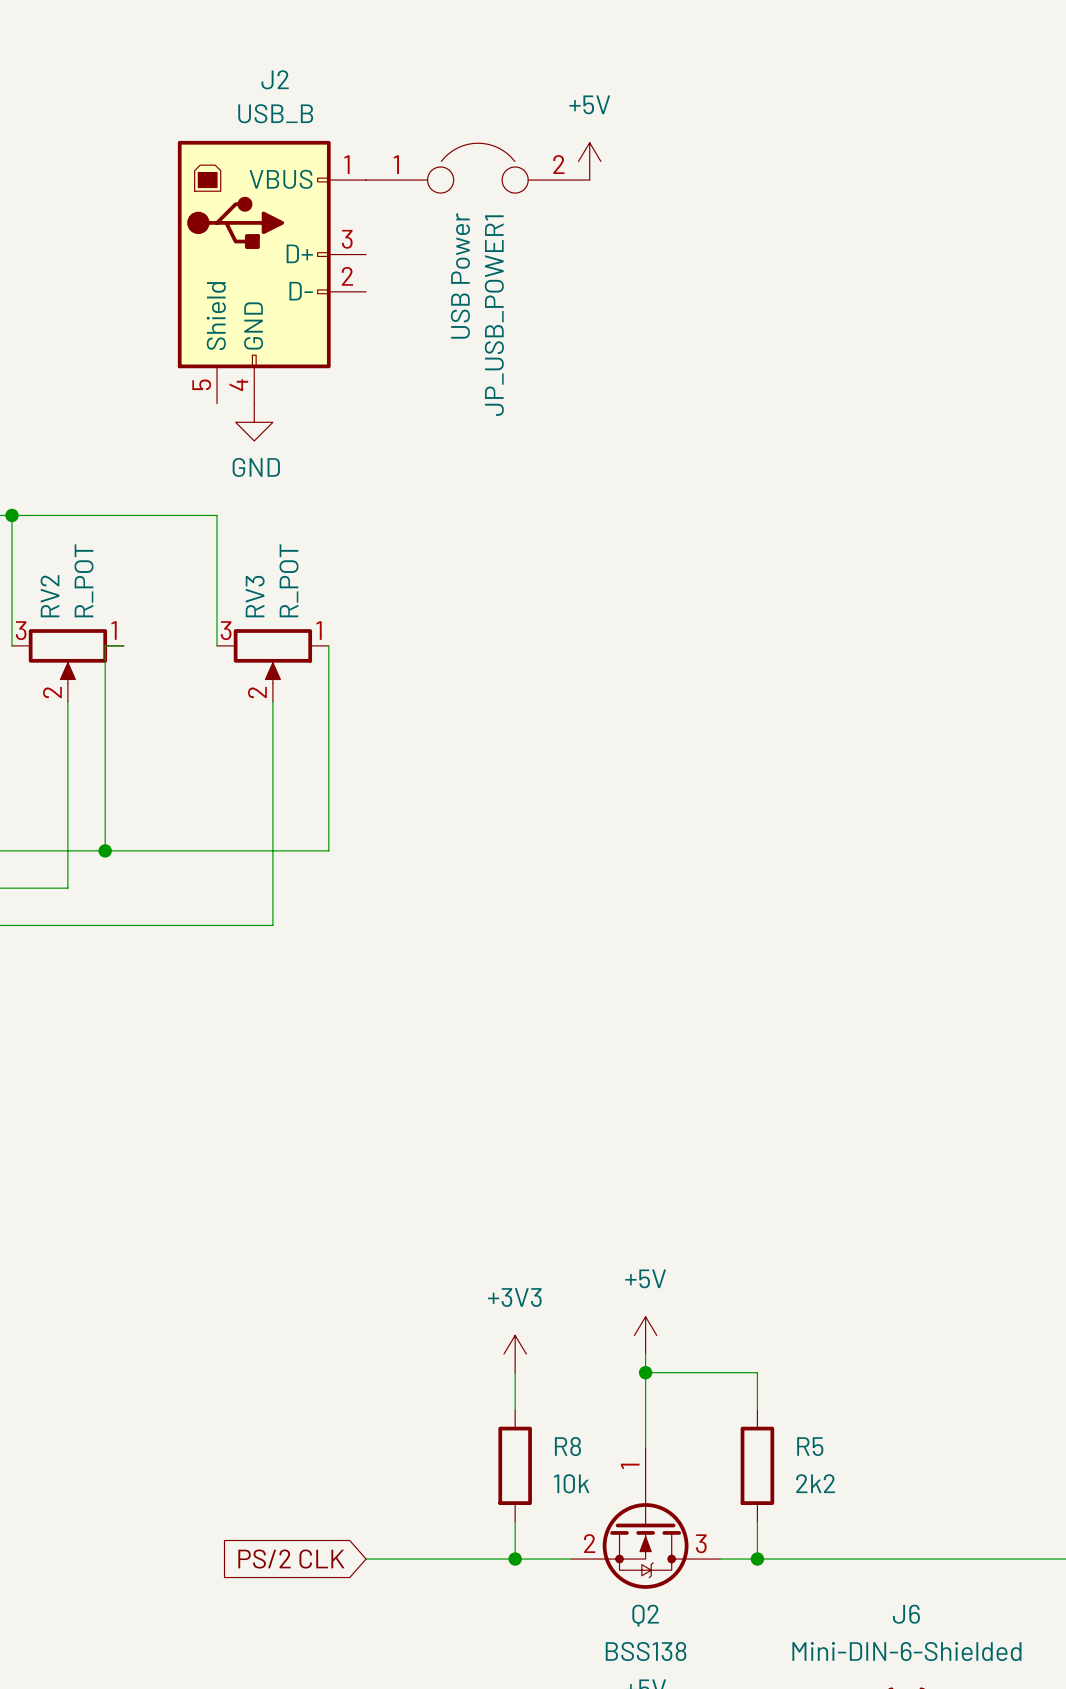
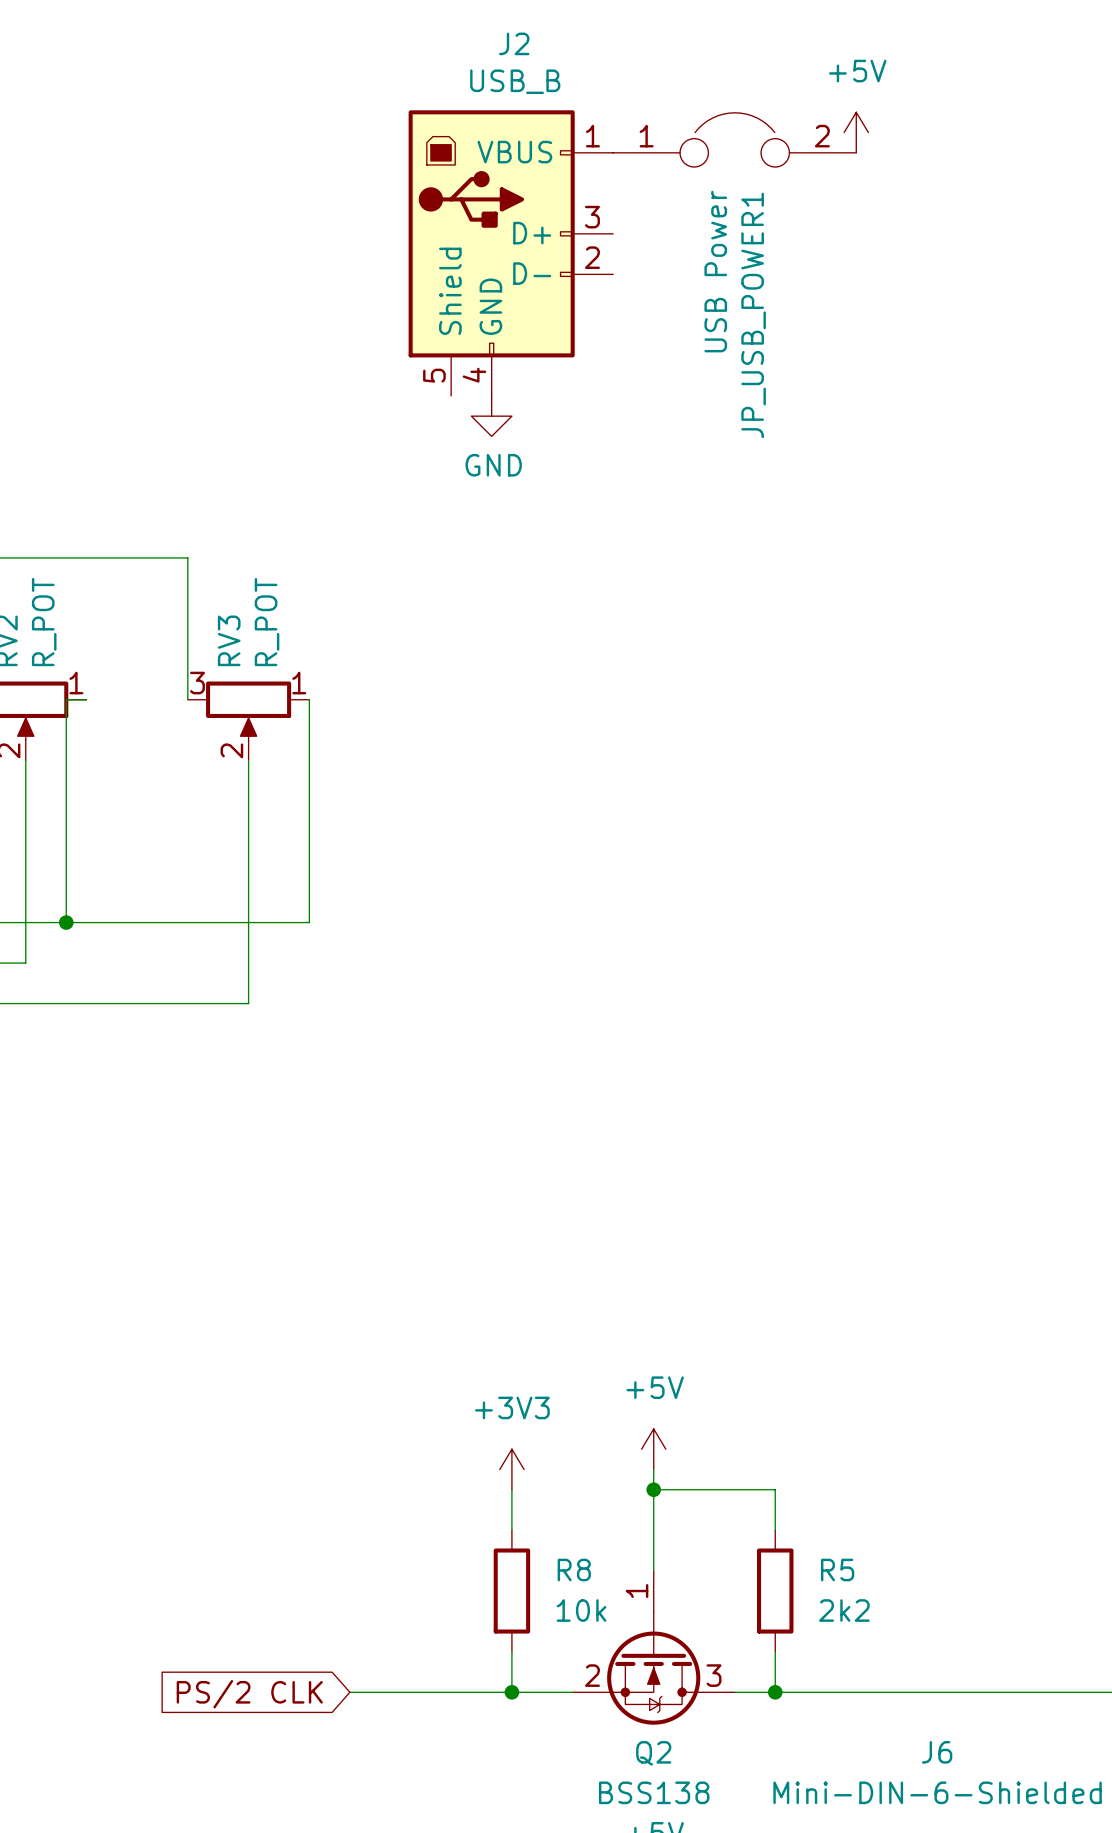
power symbol position: +5V (589, 161) -> +5V (856, 132)
JP_USB_POWER1 position: (477, 168) -> (734, 139)
J2 position: (271, 272) -> (510, 253)
power symbol position: GND (254, 422) -> GND (491, 416)

